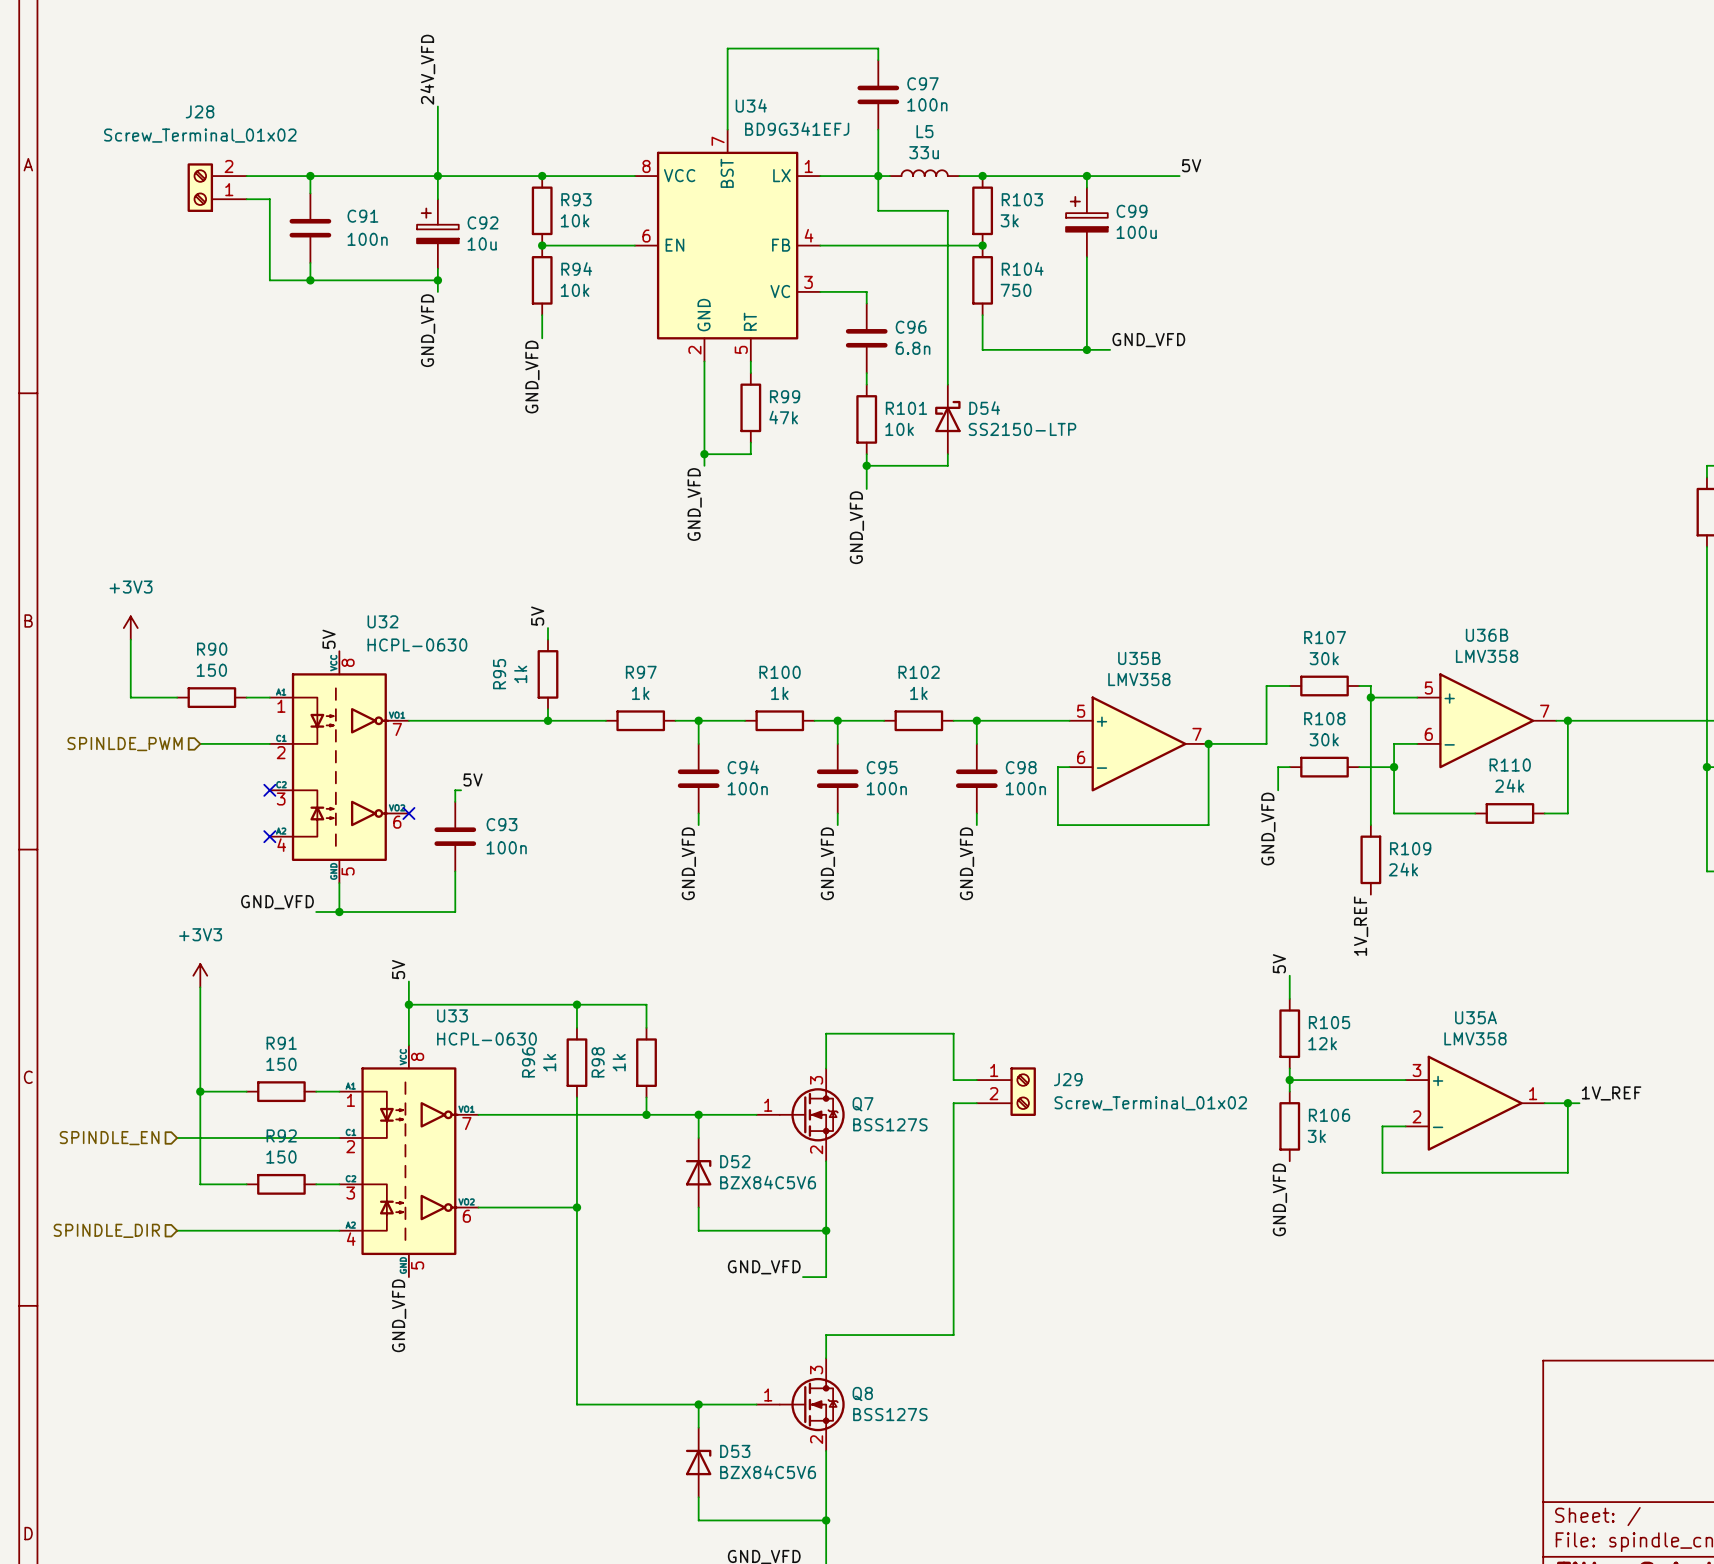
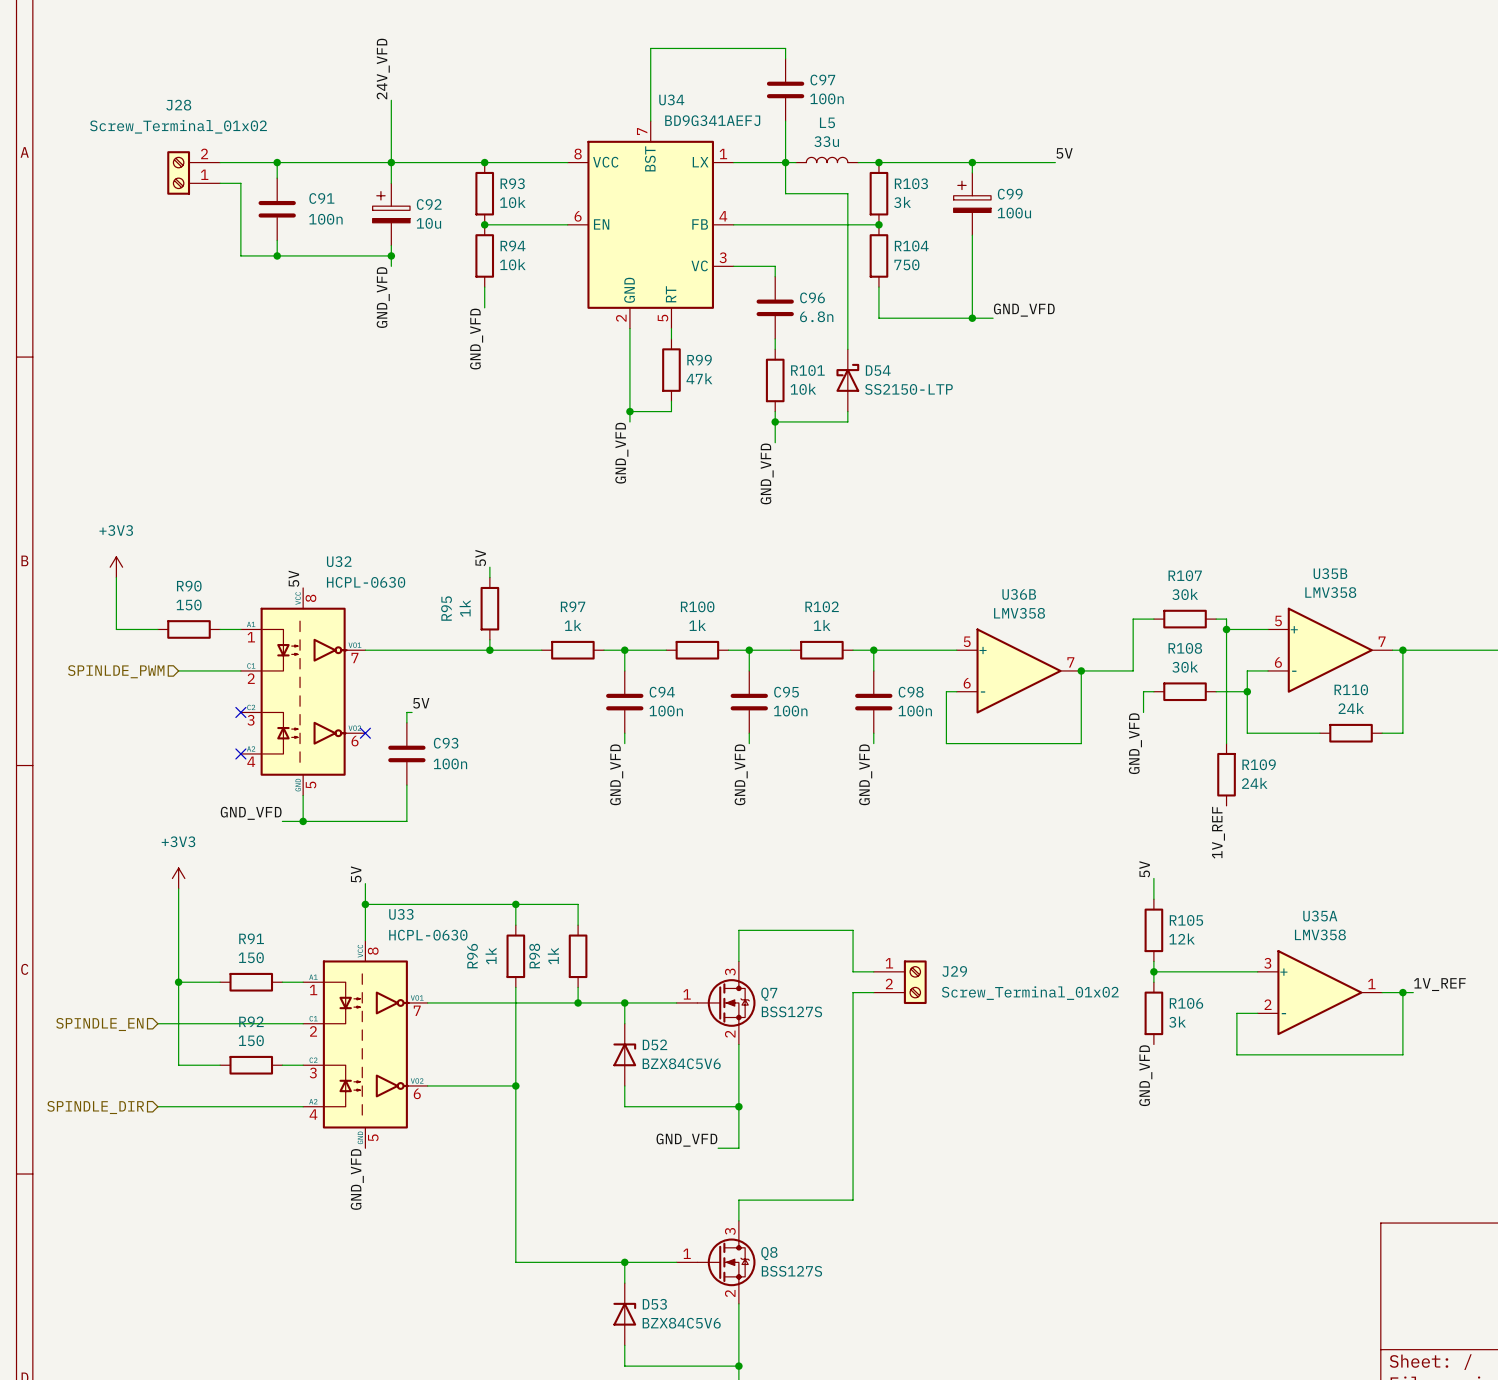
U34 value: BD9G341EFJ (797, 128) -> BD9G341AEFJ (712, 120)
U36B name: U36B (1487, 635) -> U35B (1330, 573)
U35B name: U35B (1139, 658) -> U36B (1019, 594)

